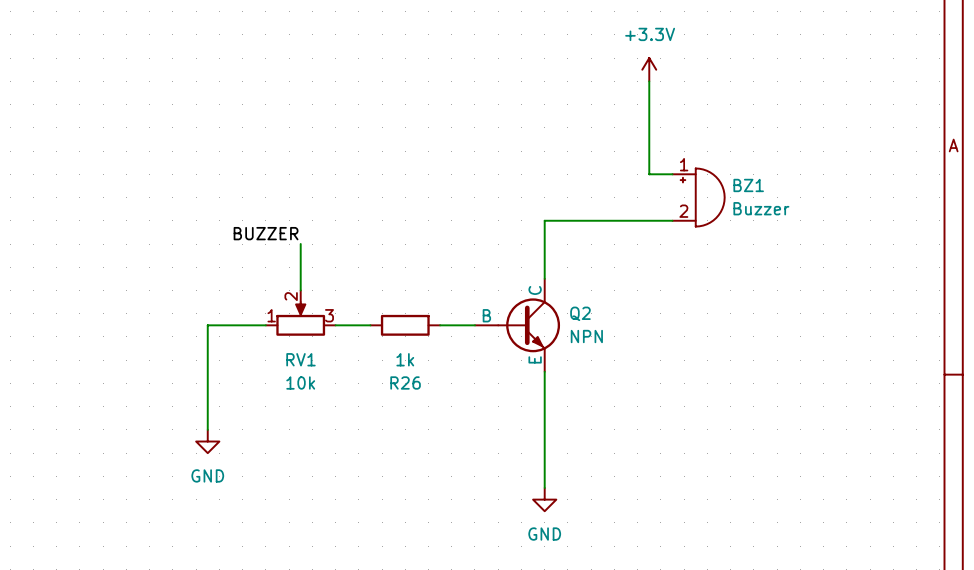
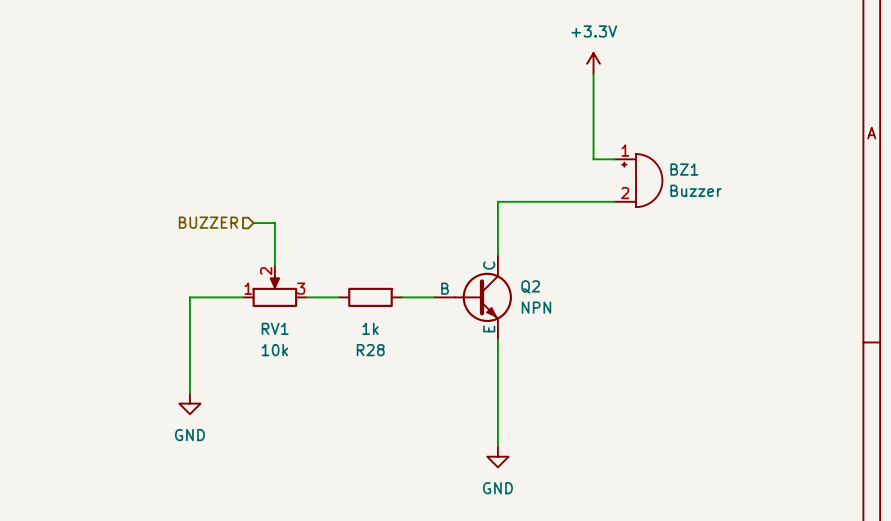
label: BUZZER (266, 233) -> none
hierarchical label: none -> BUZZER (208, 222)
wire: none -> (253, 223) (274, 223)
R26 name: R26 (405, 382) -> R28 (370, 350)

